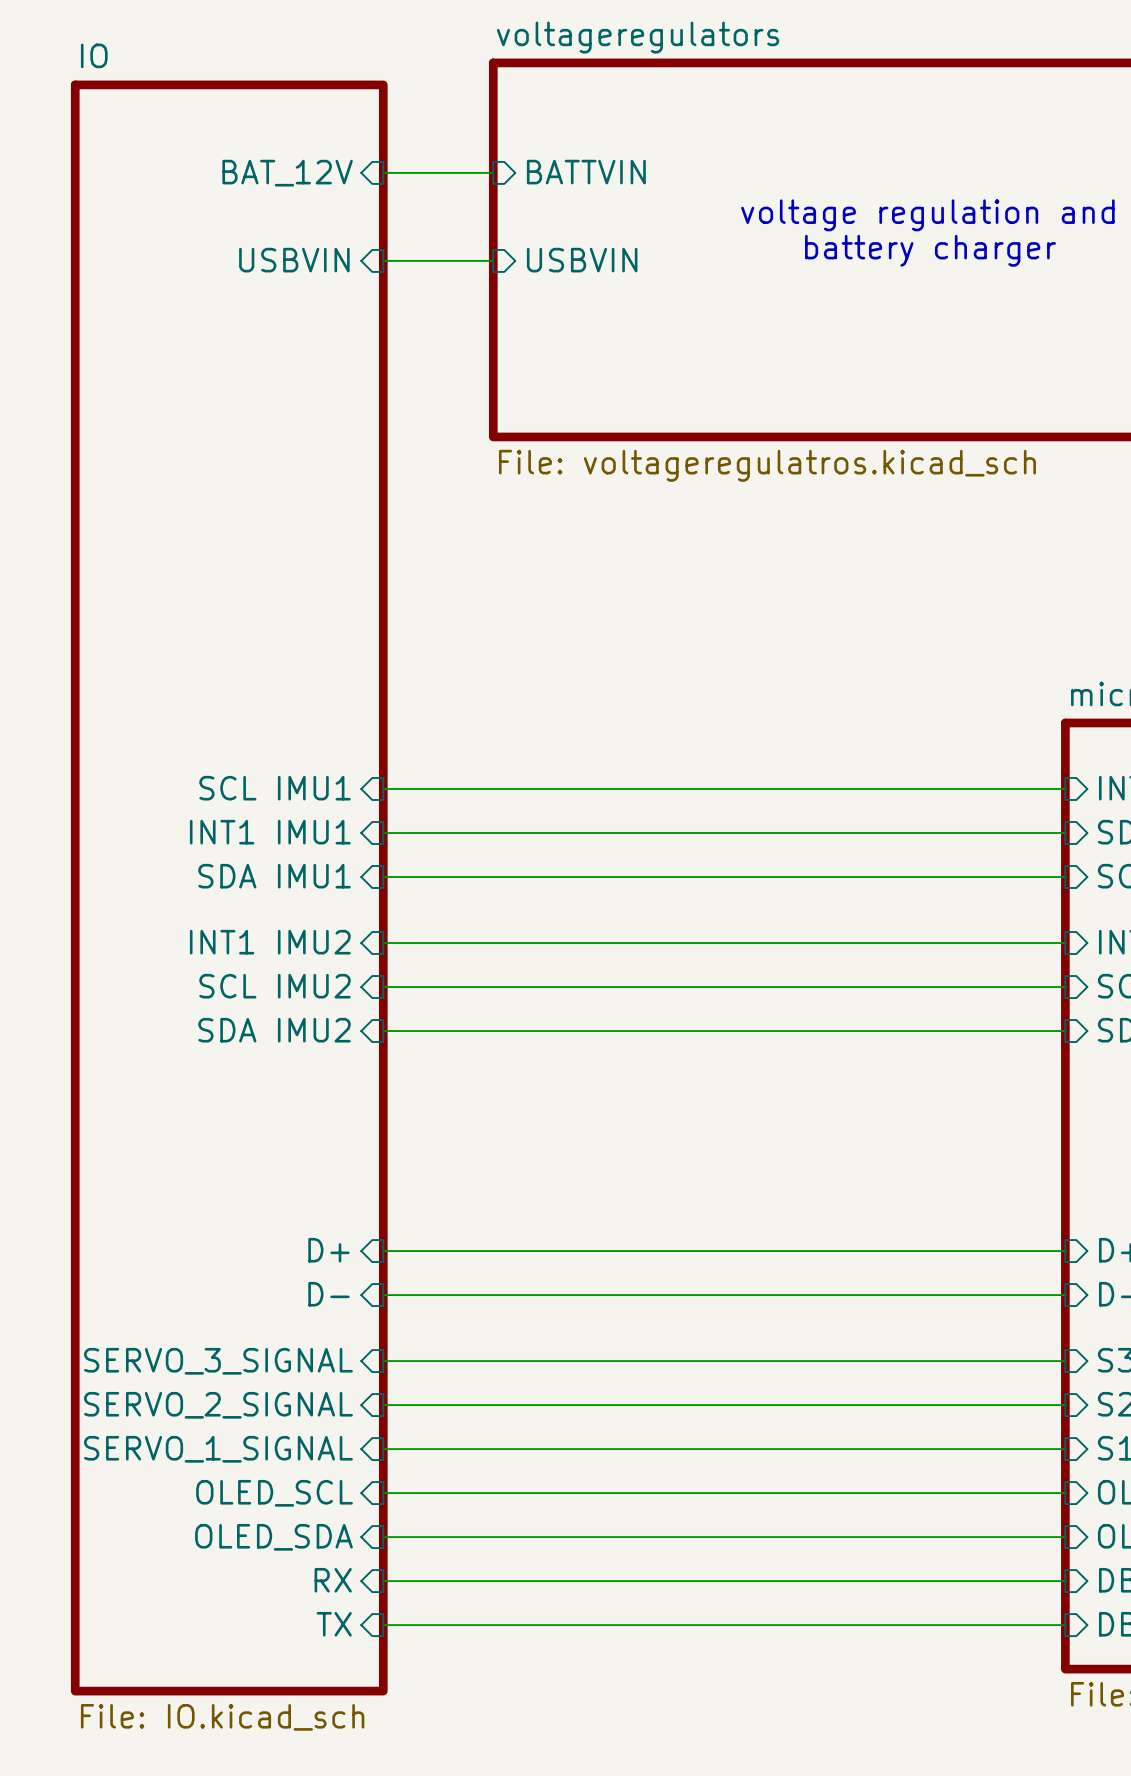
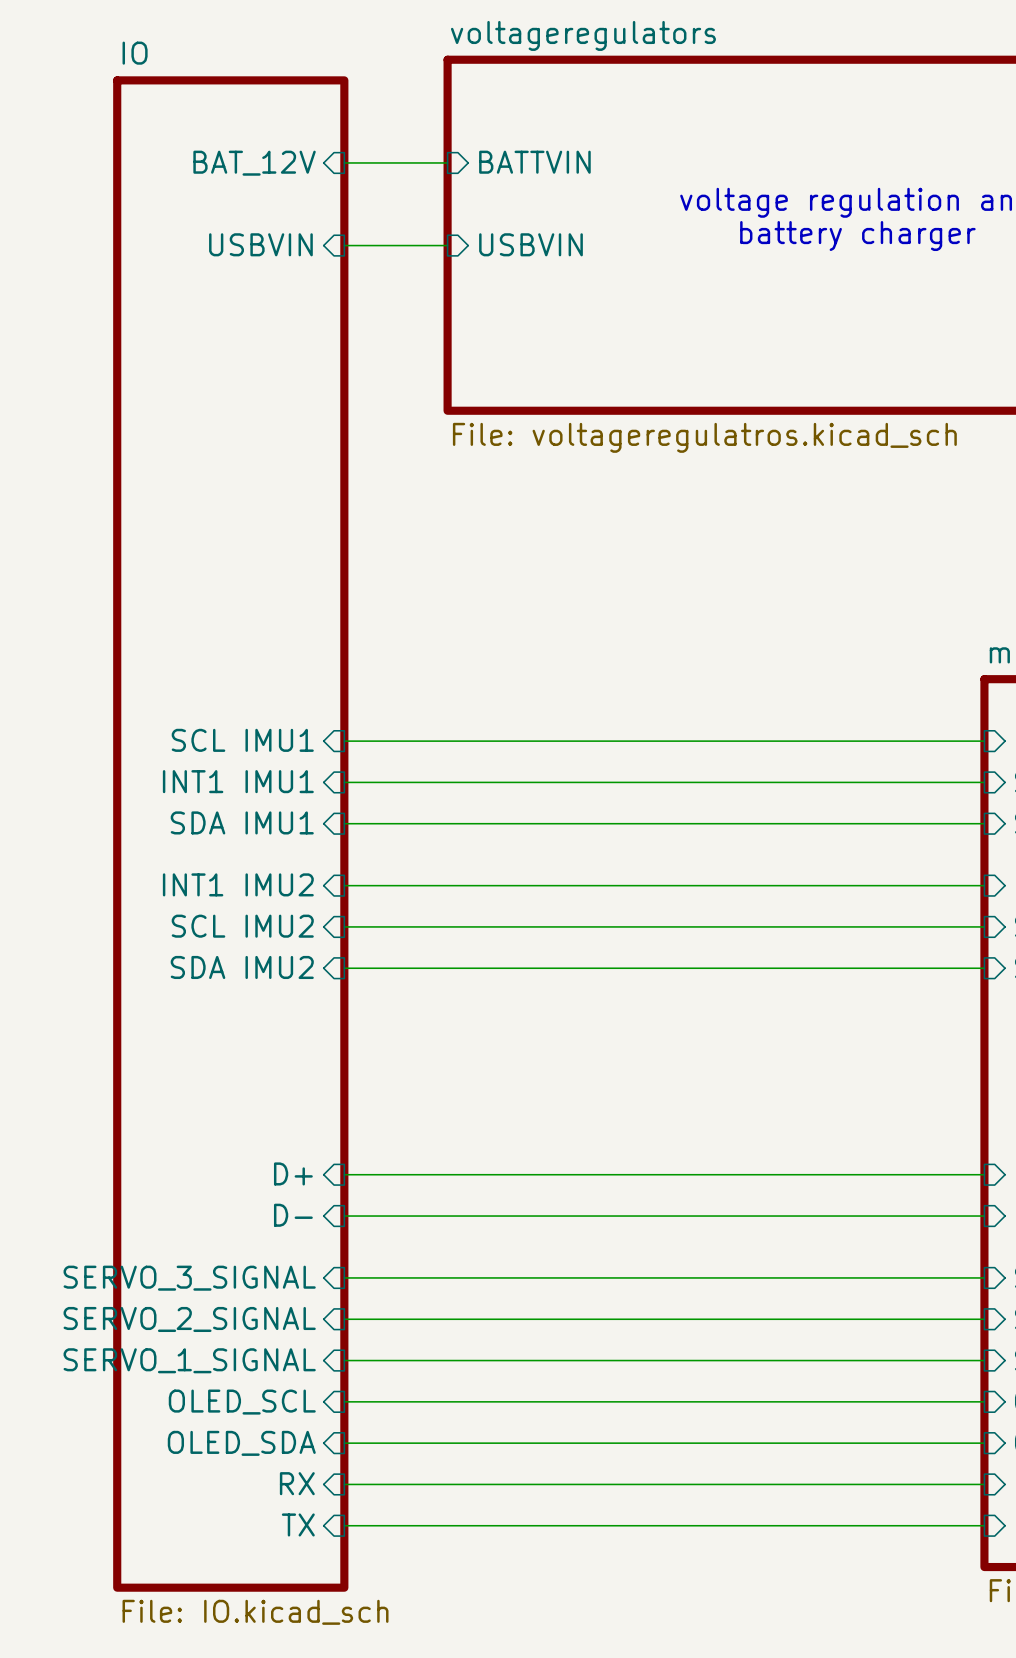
sheet IO: File: IO.kicad_sch (229, 888) -> none
sheet IO: none -> File: IO.kicad_sch (230, 834)

